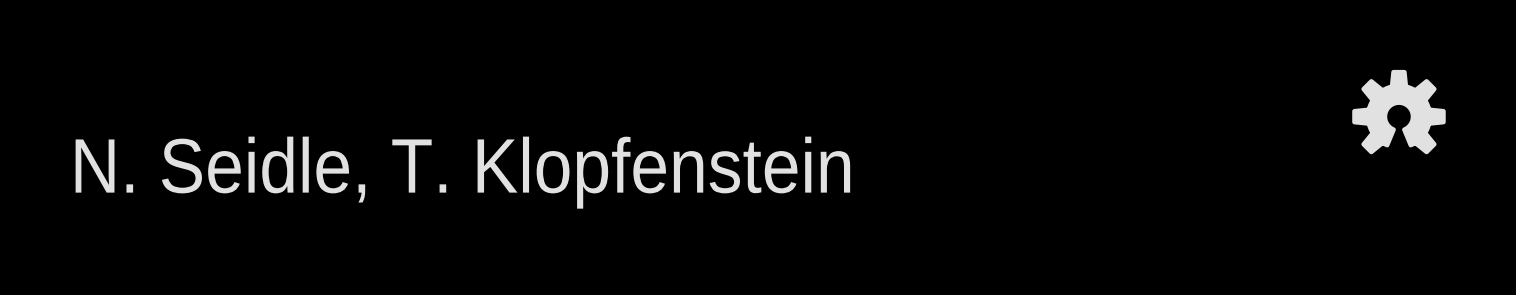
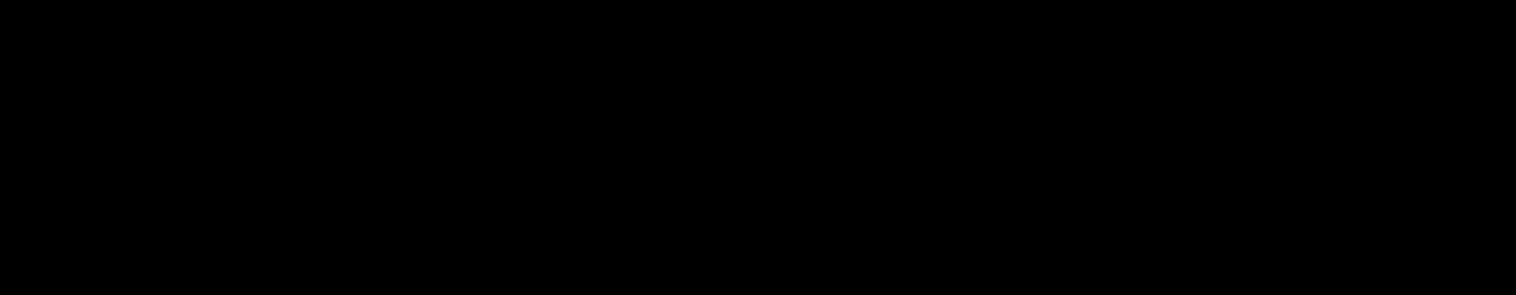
drawing: [1352, 69, 1446, 155] -> none
text: N. Seidle, T. Klopfenstein (462, 172) -> none

